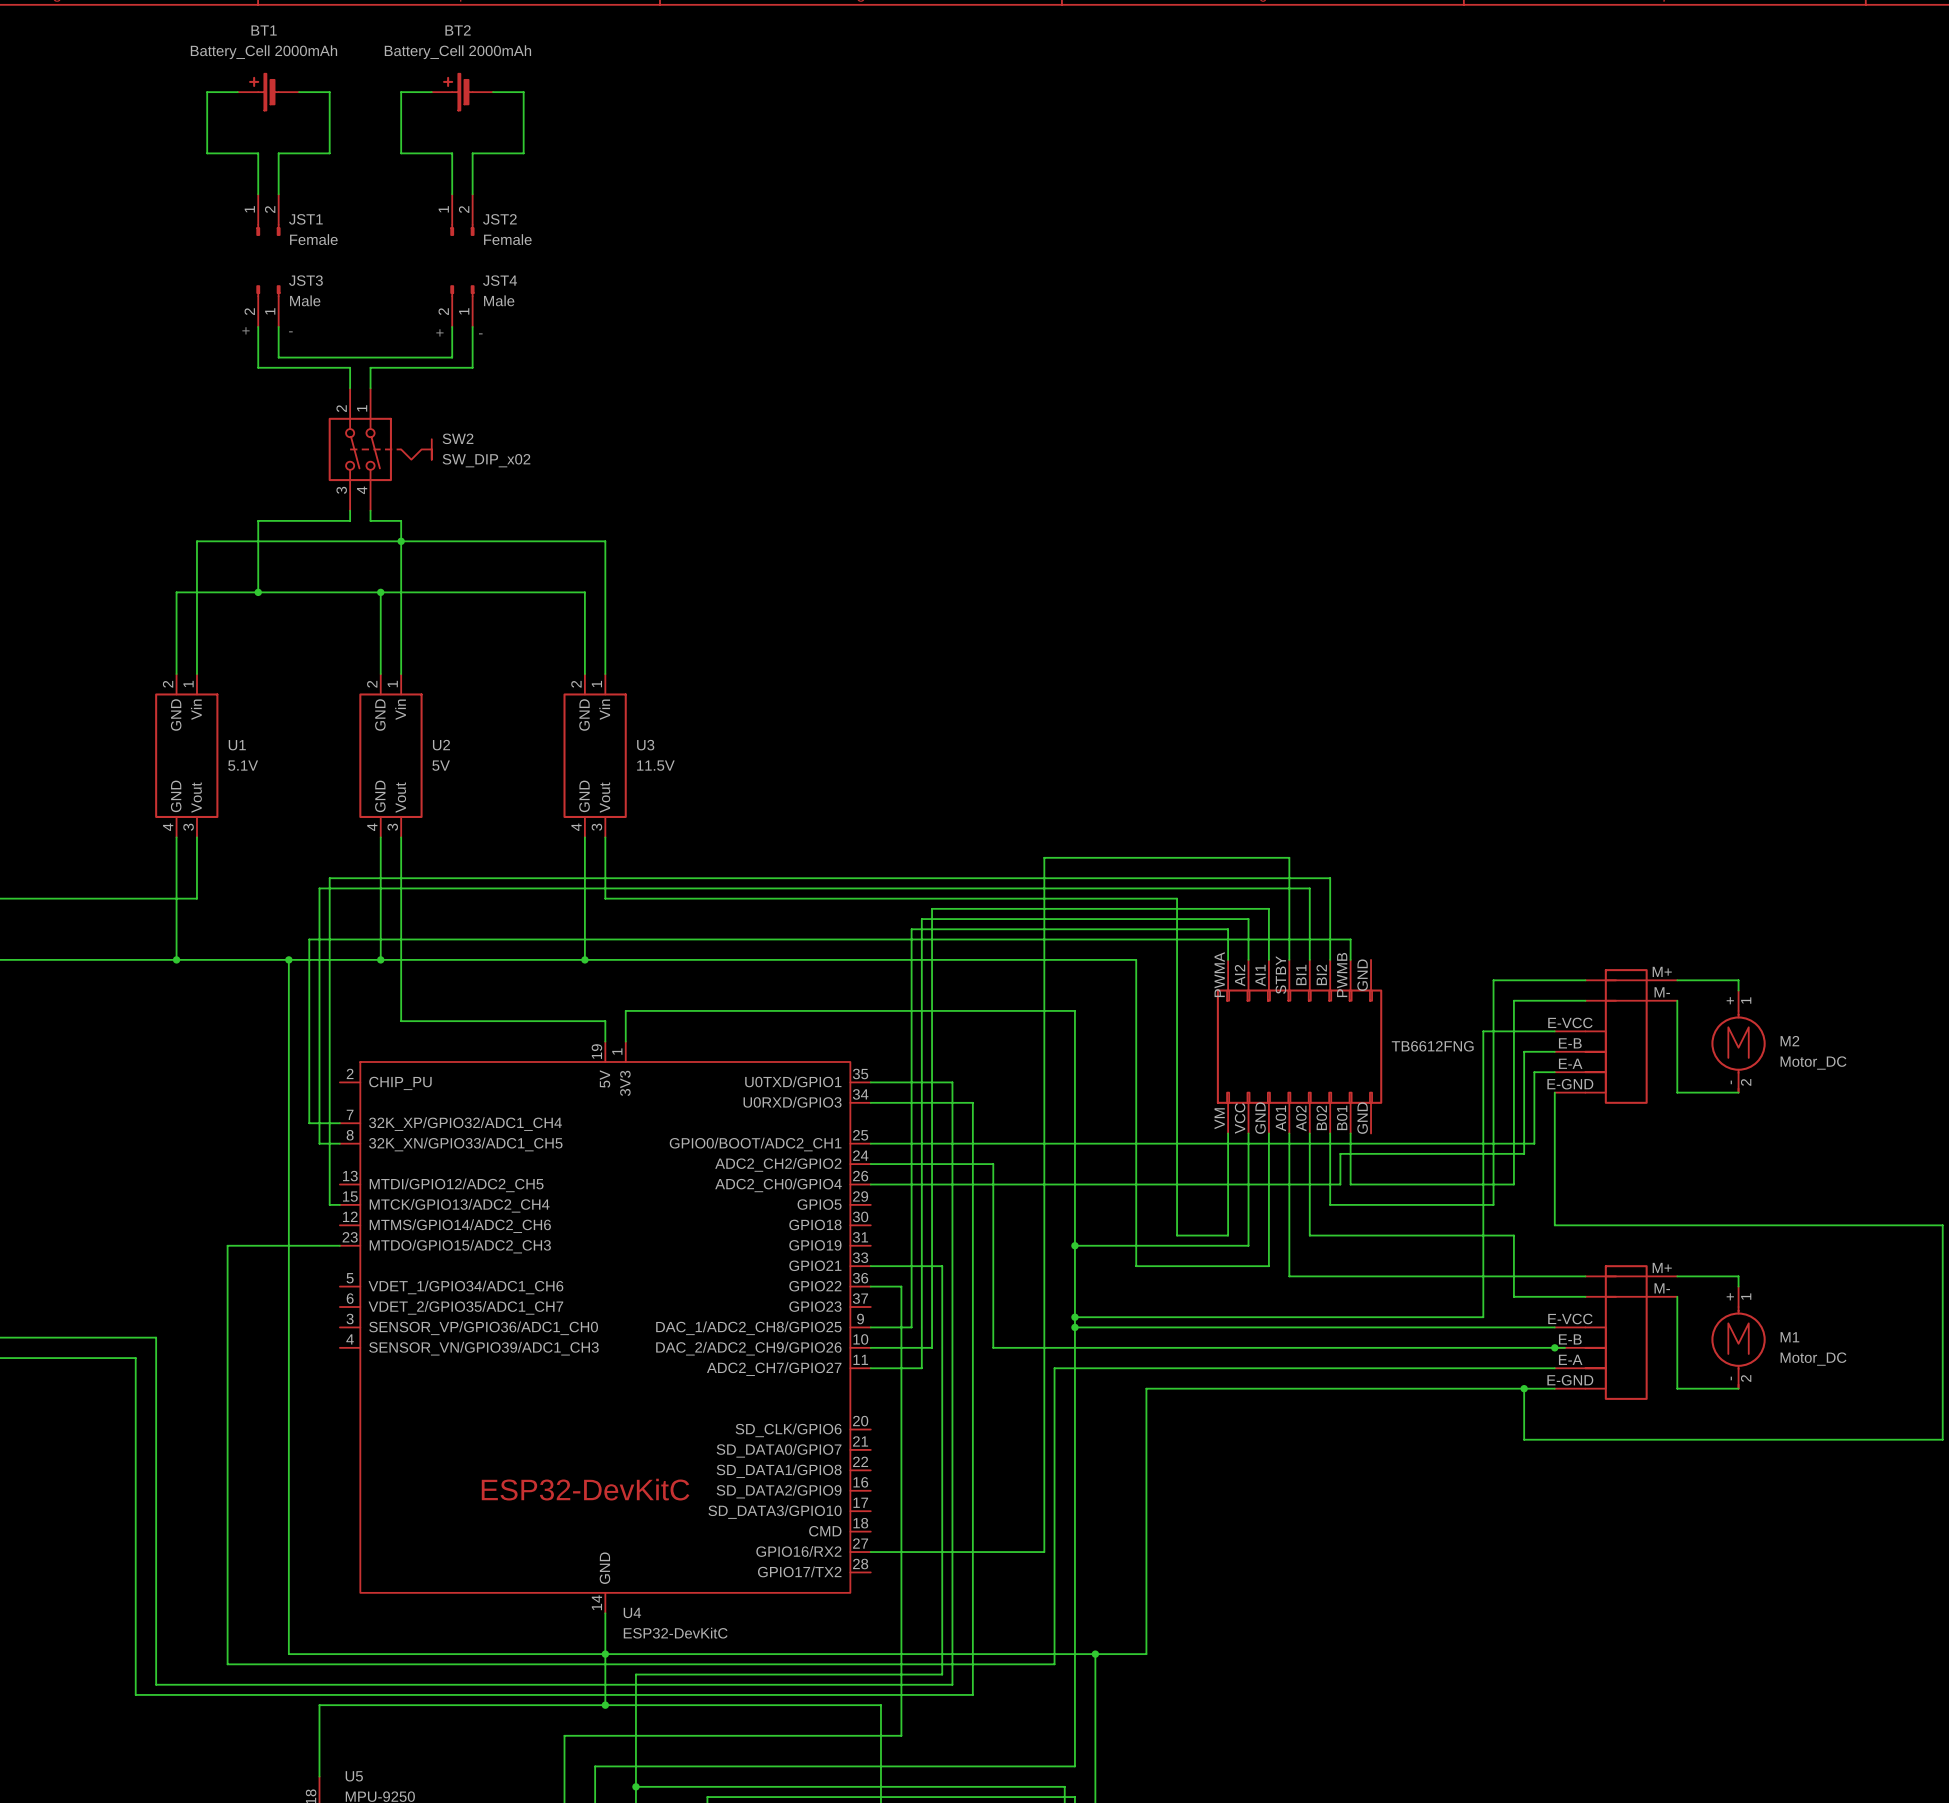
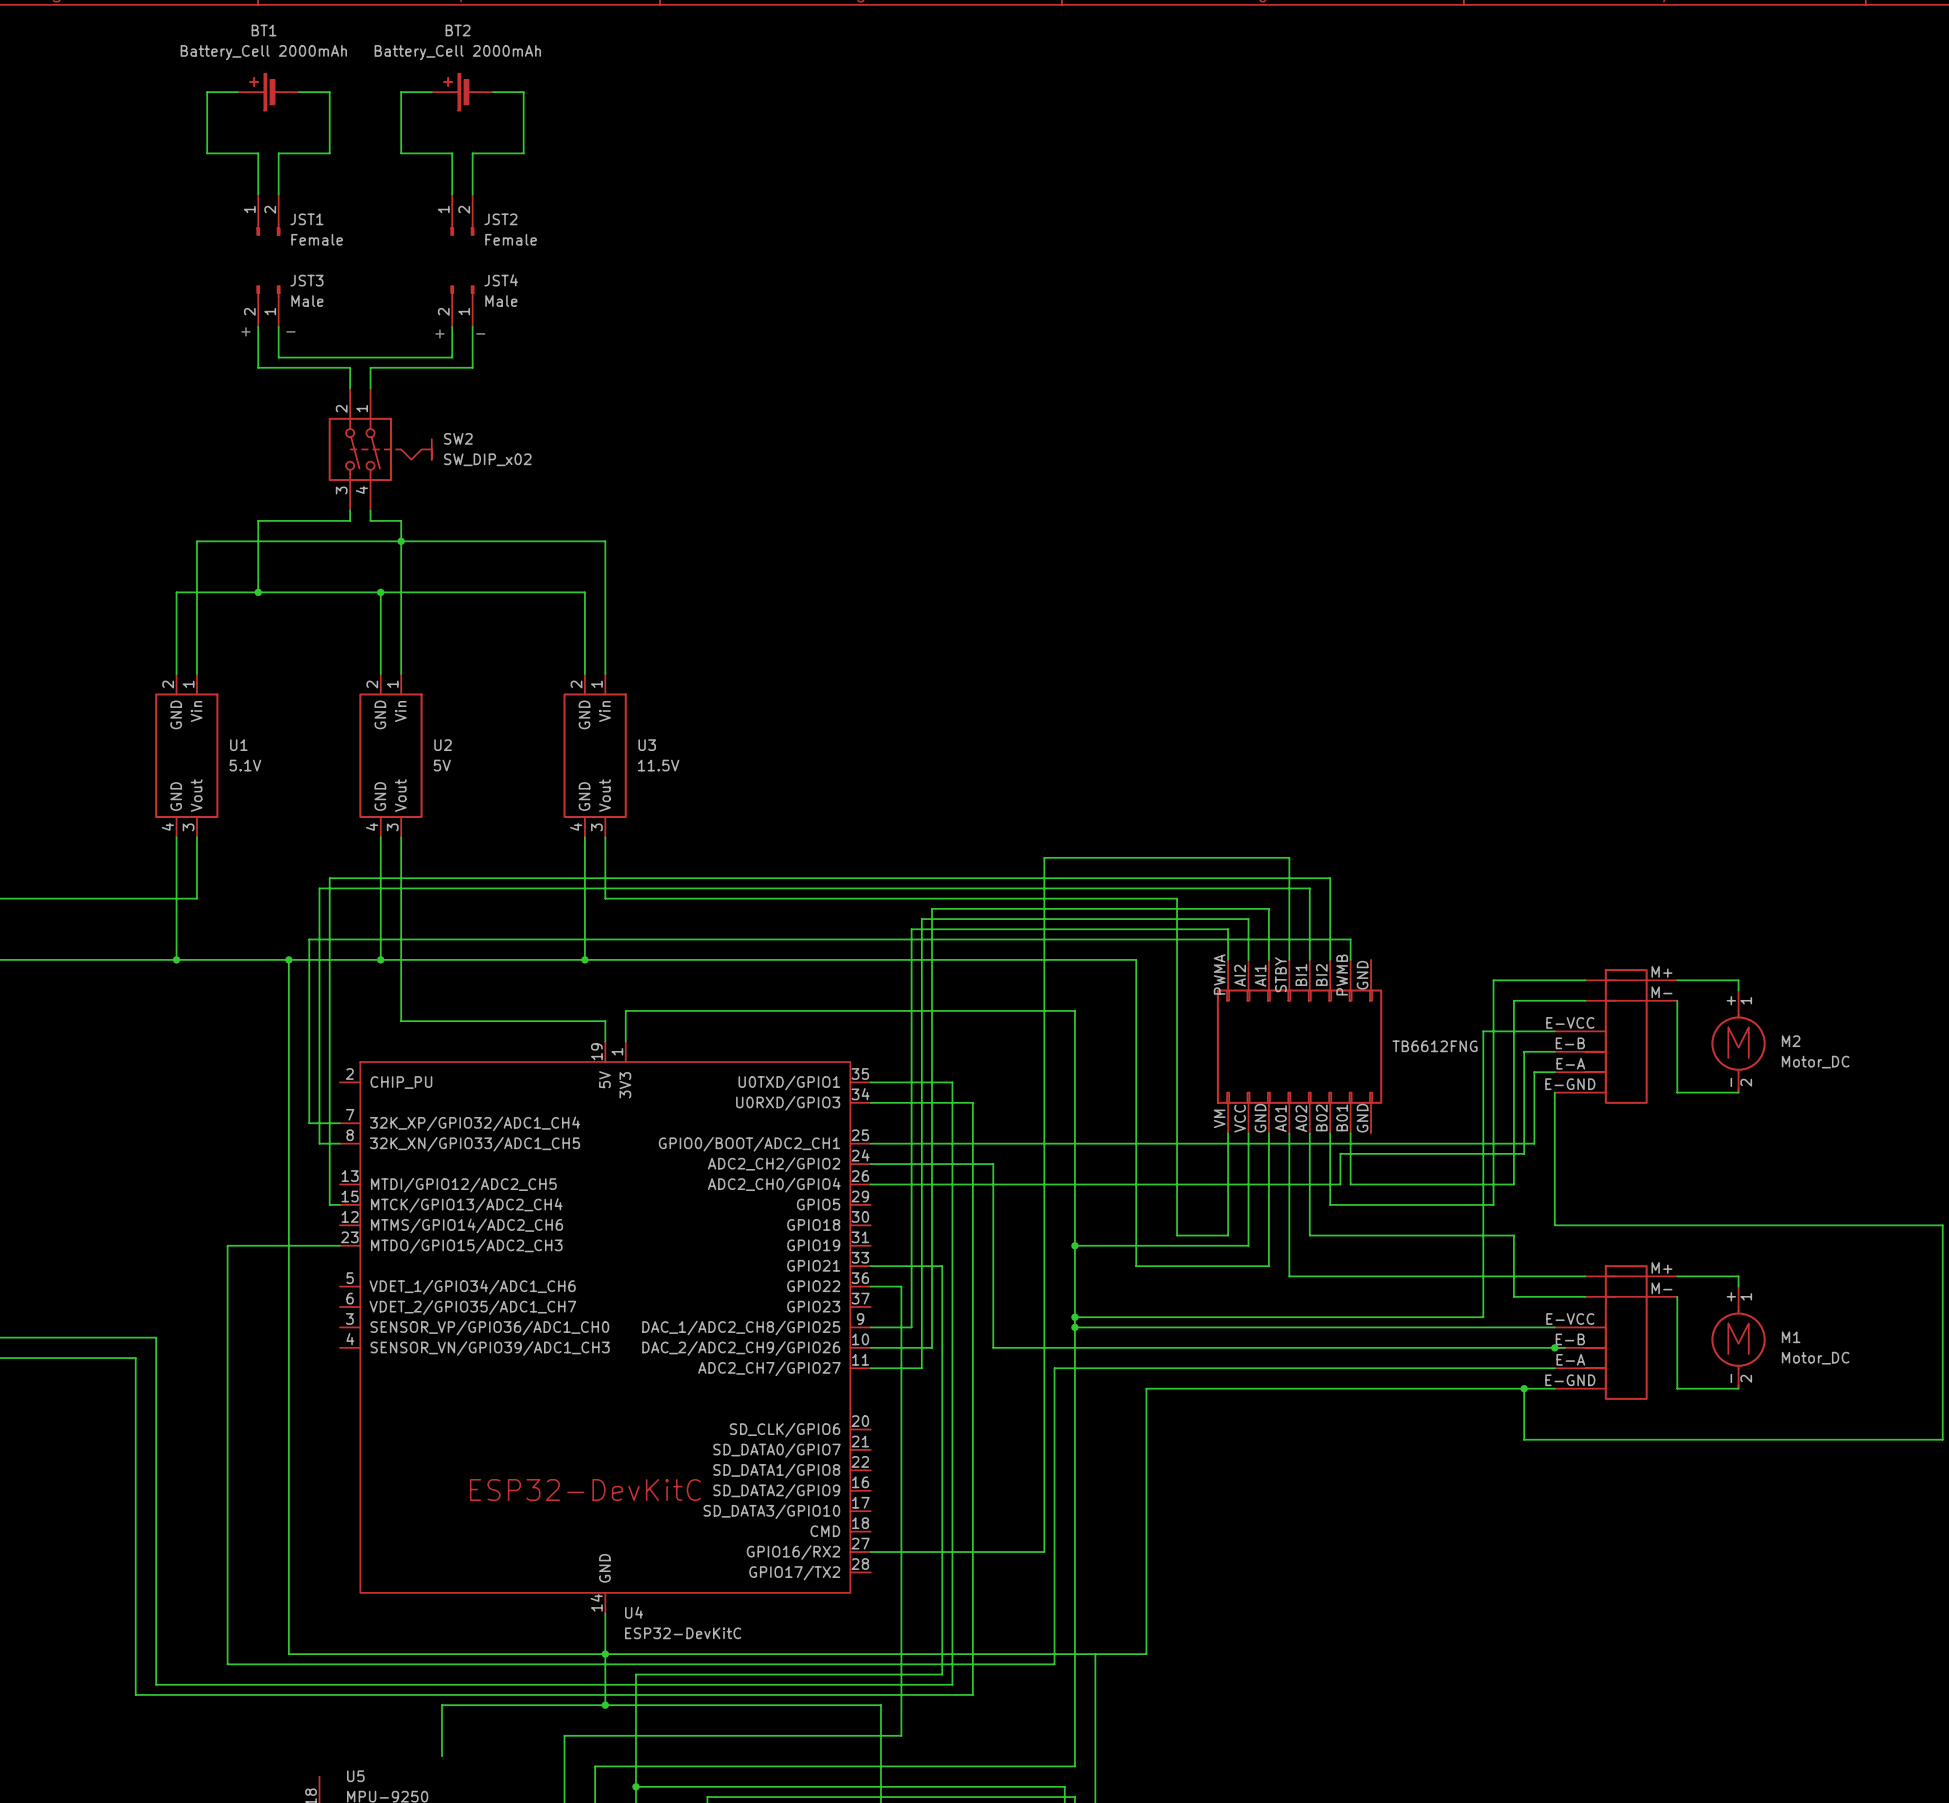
junction: (1095, 1654) -> none
wire: (441, 1705) (319, 1705) (319, 1776) -> (441, 1705) (441, 1756)

